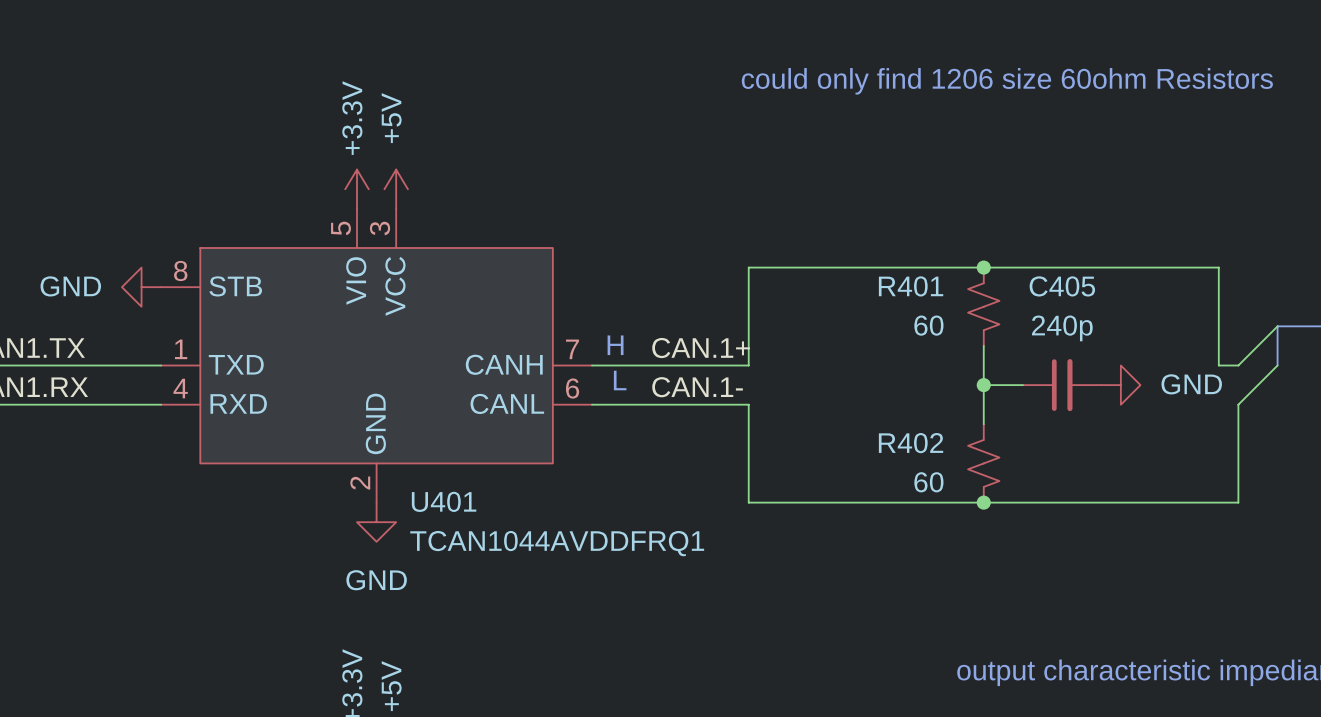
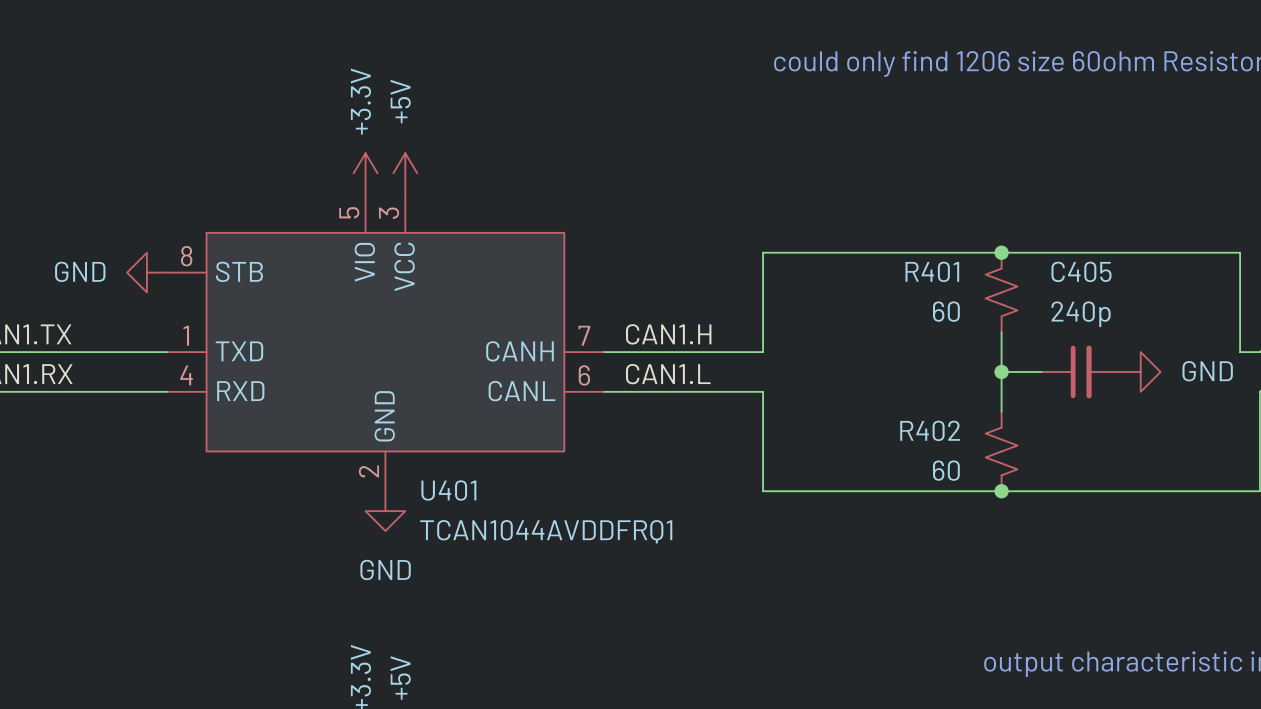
text: H (615, 345) -> none
label: none -> CAN1.H (668, 334)
label: CAN.1+ (701, 348) -> none
text: L (620, 380) -> none
label: none -> CAN1.L (668, 374)
label: CAN.1- (697, 387) -> none

